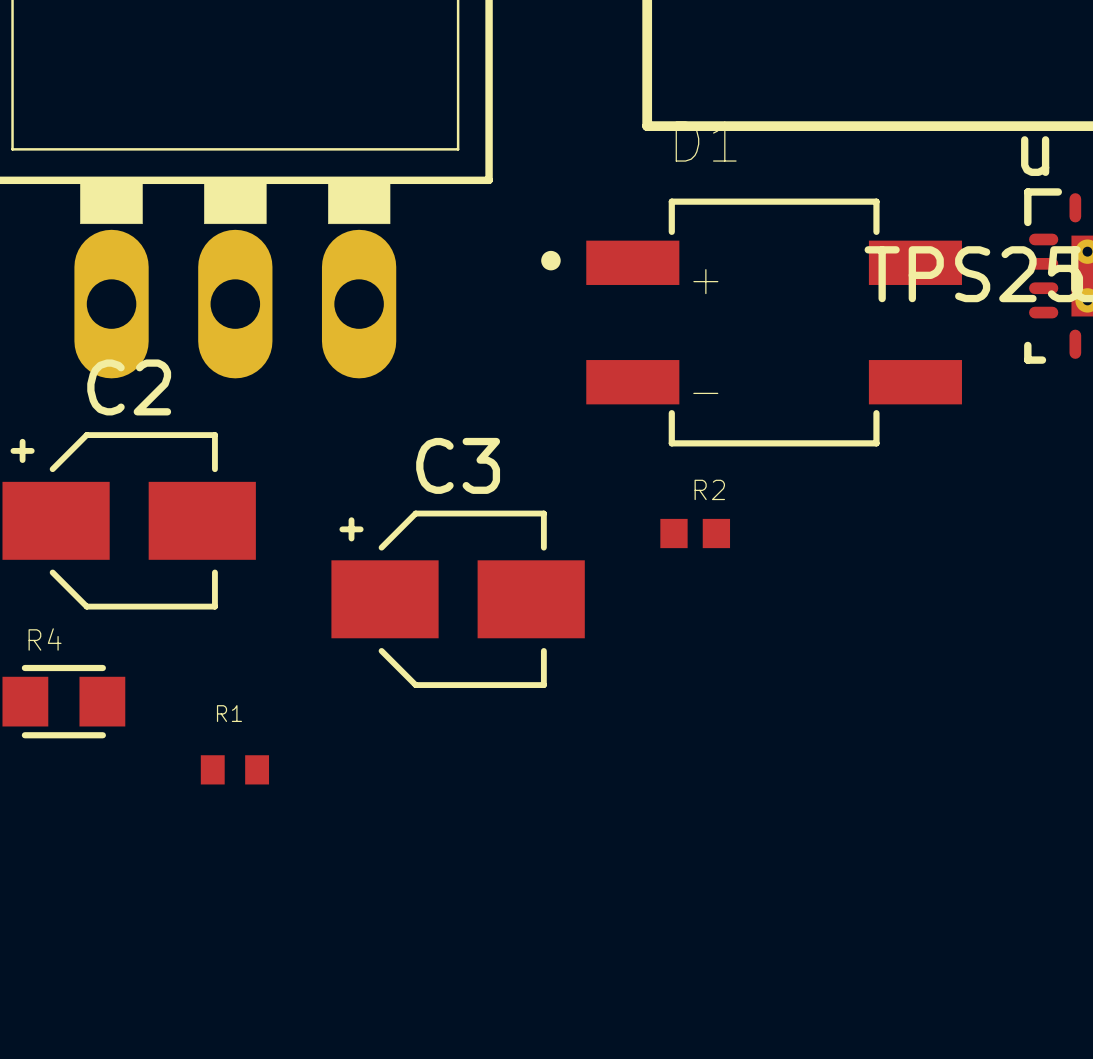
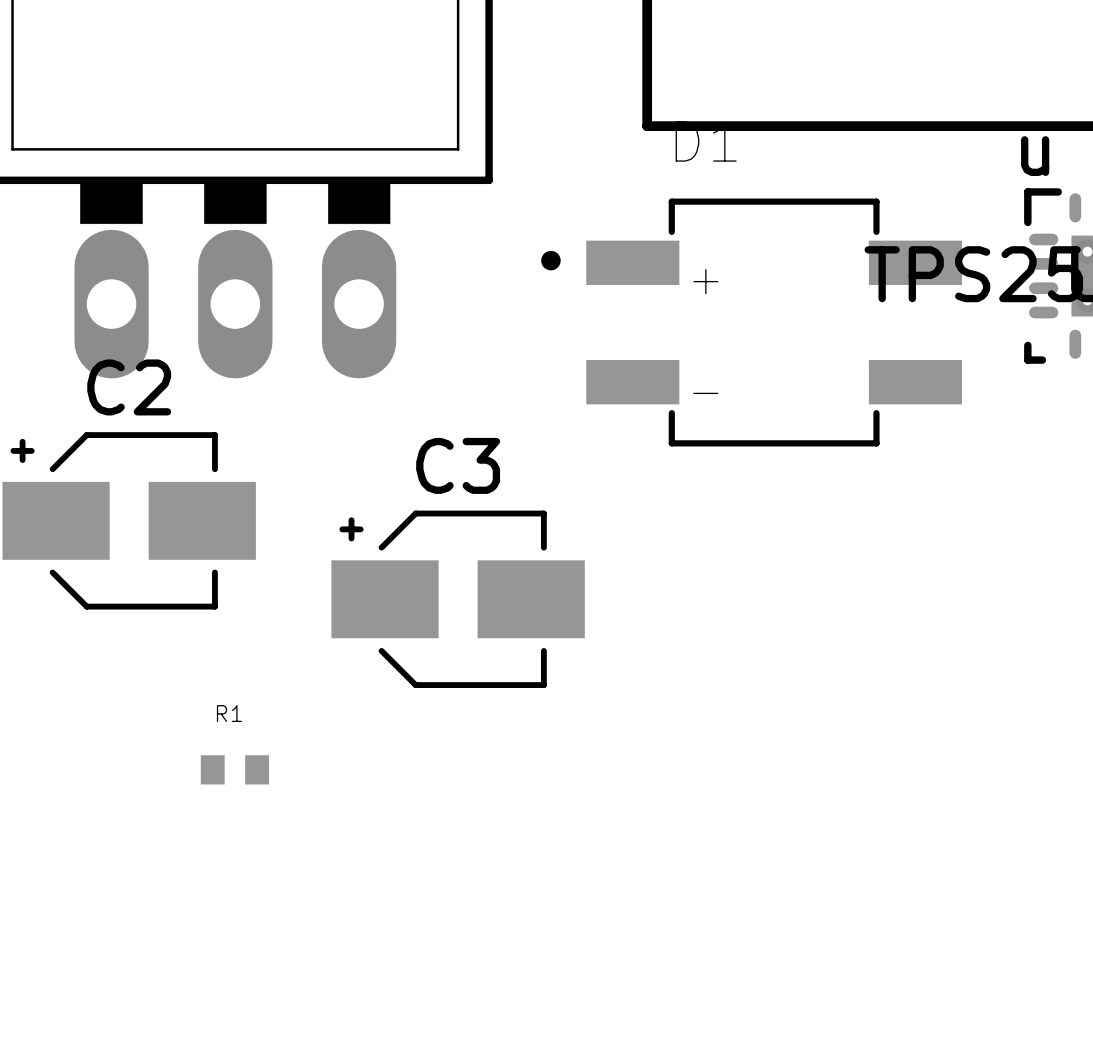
R2: (695, 533) -> none
R4: (63, 701) -> none

